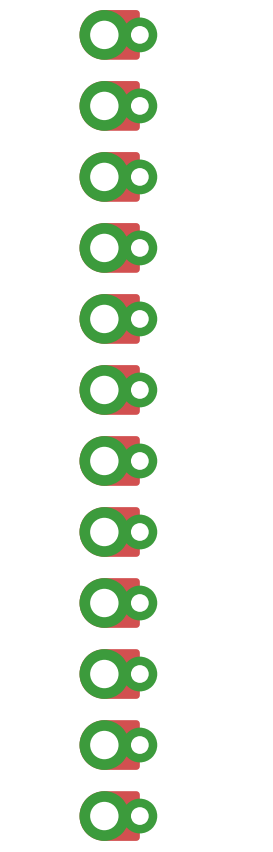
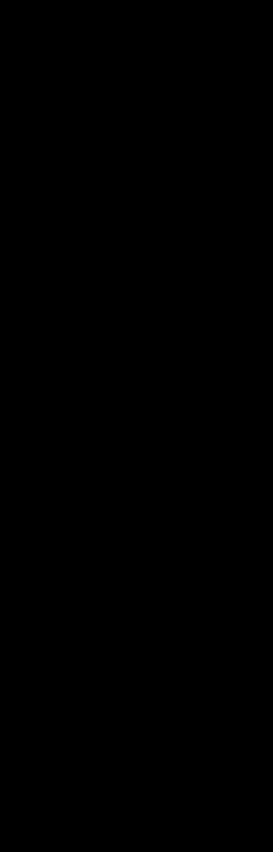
part: (118, 425) -> none

